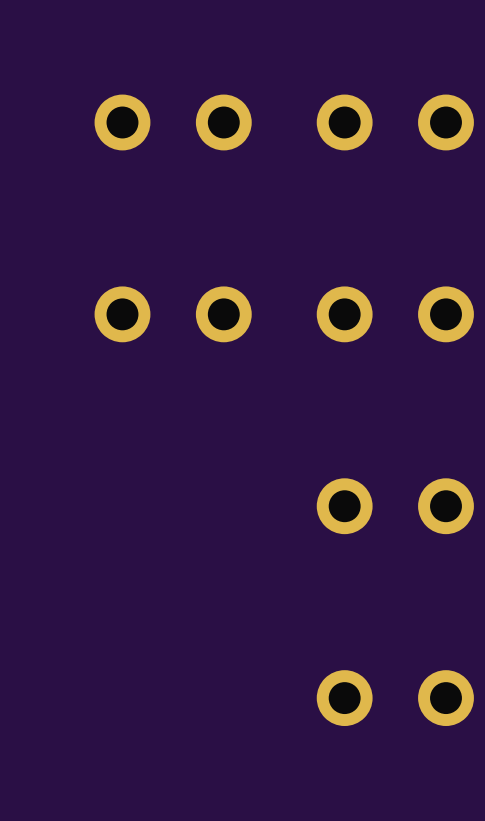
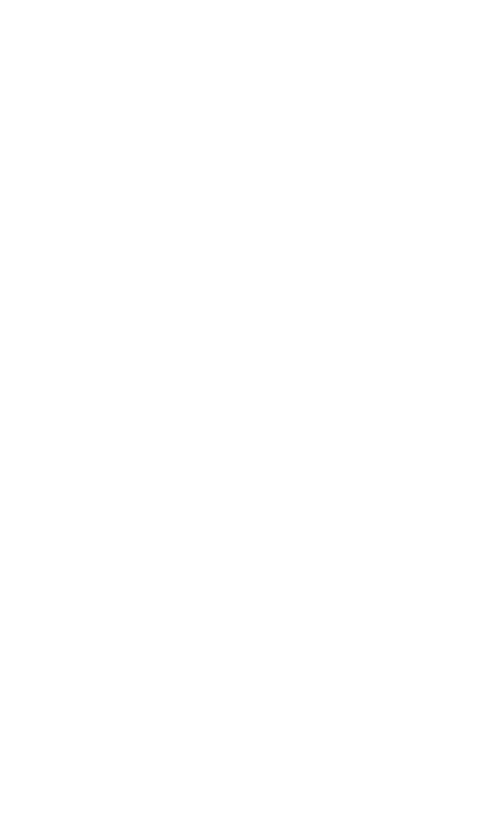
part: (173, 122) -> none
part: (395, 122) -> none
part: (173, 314) -> none
part: (395, 314) -> none
part: (395, 506) -> none
part: (395, 698) -> none

